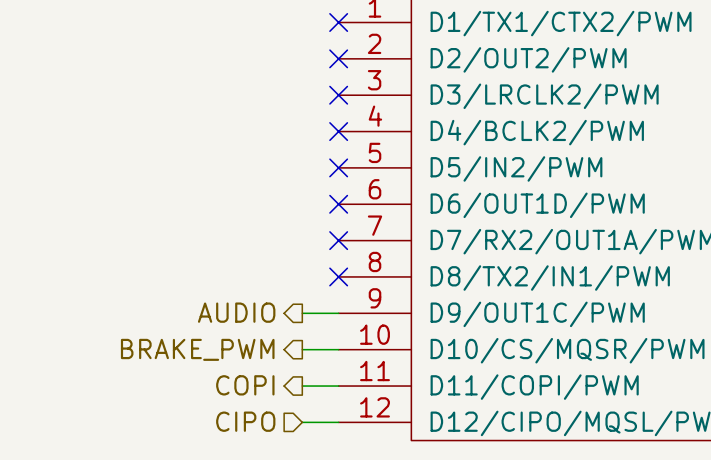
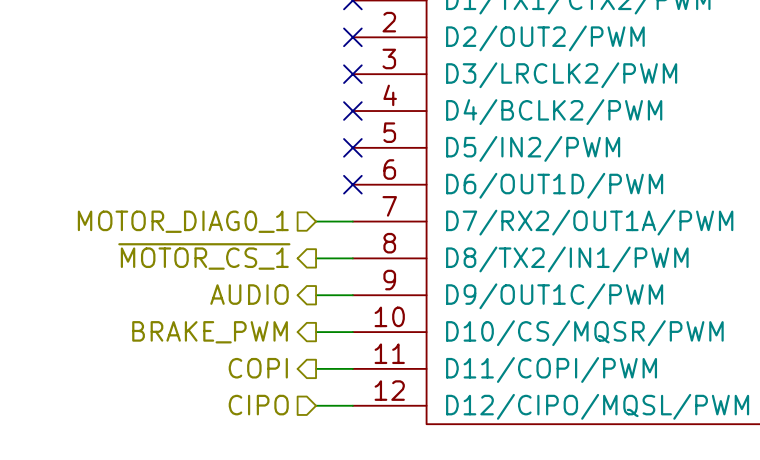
hierarchical label: none -> MOTOR_DIAG0_1 (183, 221)
wire: none -> (316, 221) (352, 221)
no-connect mark: (338, 240) -> none
hierarchical label: none -> ~{MOTOR_CS_1} (204, 256)
wire: none -> (316, 258) (352, 258)
no-connect mark: (338, 276) -> none

